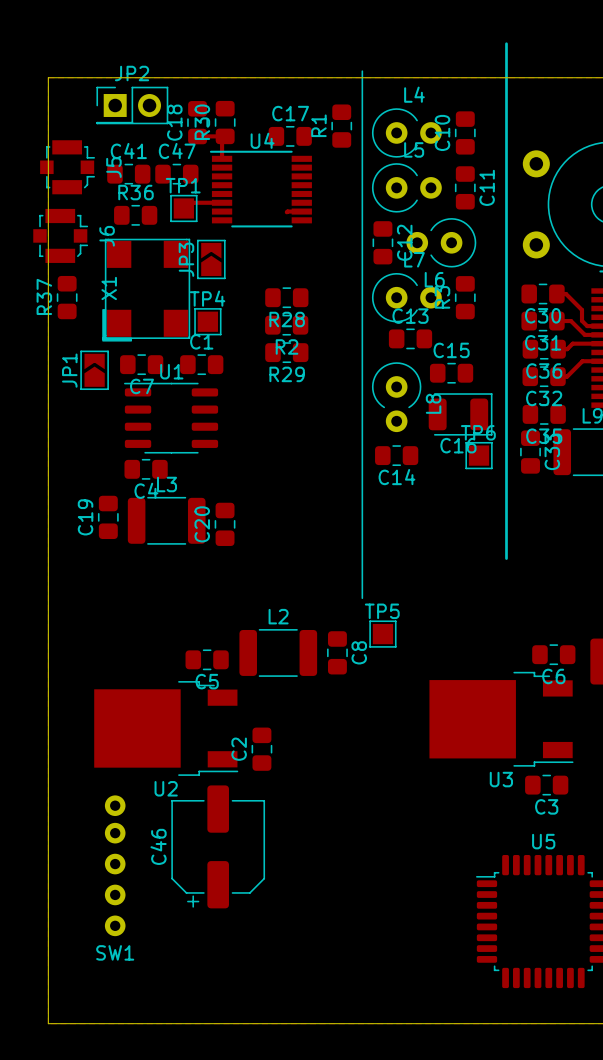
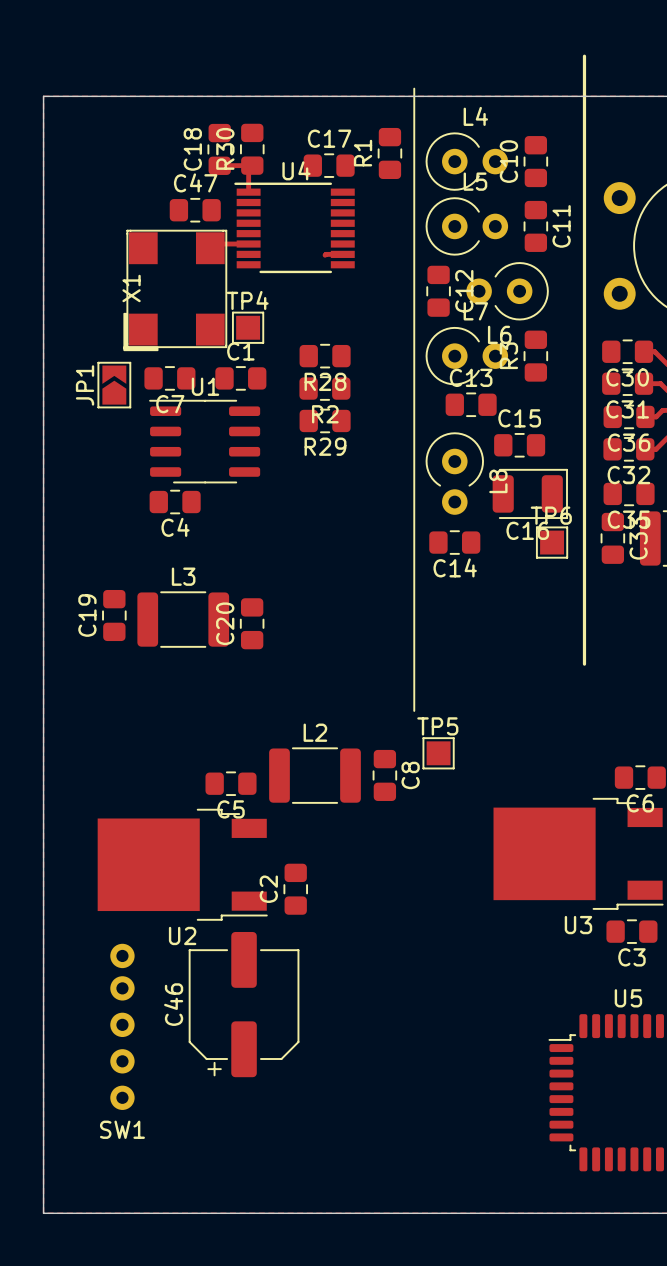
JP2: (132, 105) -> none
J5: (67, 167) -> none
C41: (128, 174) -> none
TP1: (183, 208) -> none
R36: (135, 215) -> none
J6: (60, 235) -> none
JP3: (211, 259) -> none
X1 position: (146, 290) -> (175, 290)
R37: (67, 297) -> none
TP4 position: (207, 321) -> (248, 327)
C7 position: (141, 364) -> (169, 378)
C1 position: (201, 364) -> (240, 378)
JP1 position: (94, 370) -> (114, 385)
U1 position: (171, 418) -> (204, 441)
C4 position: (146, 469) -> (175, 502)

